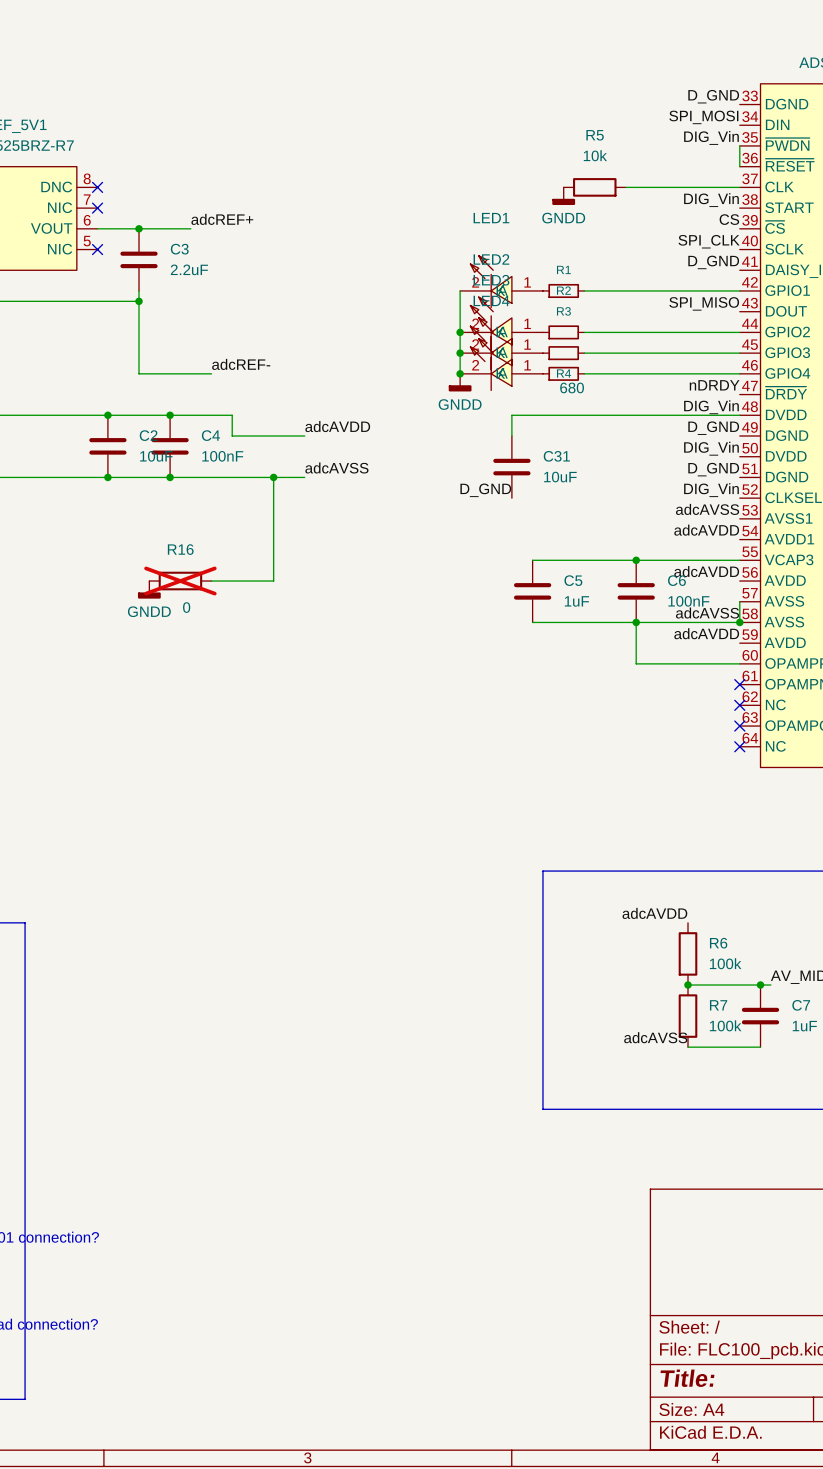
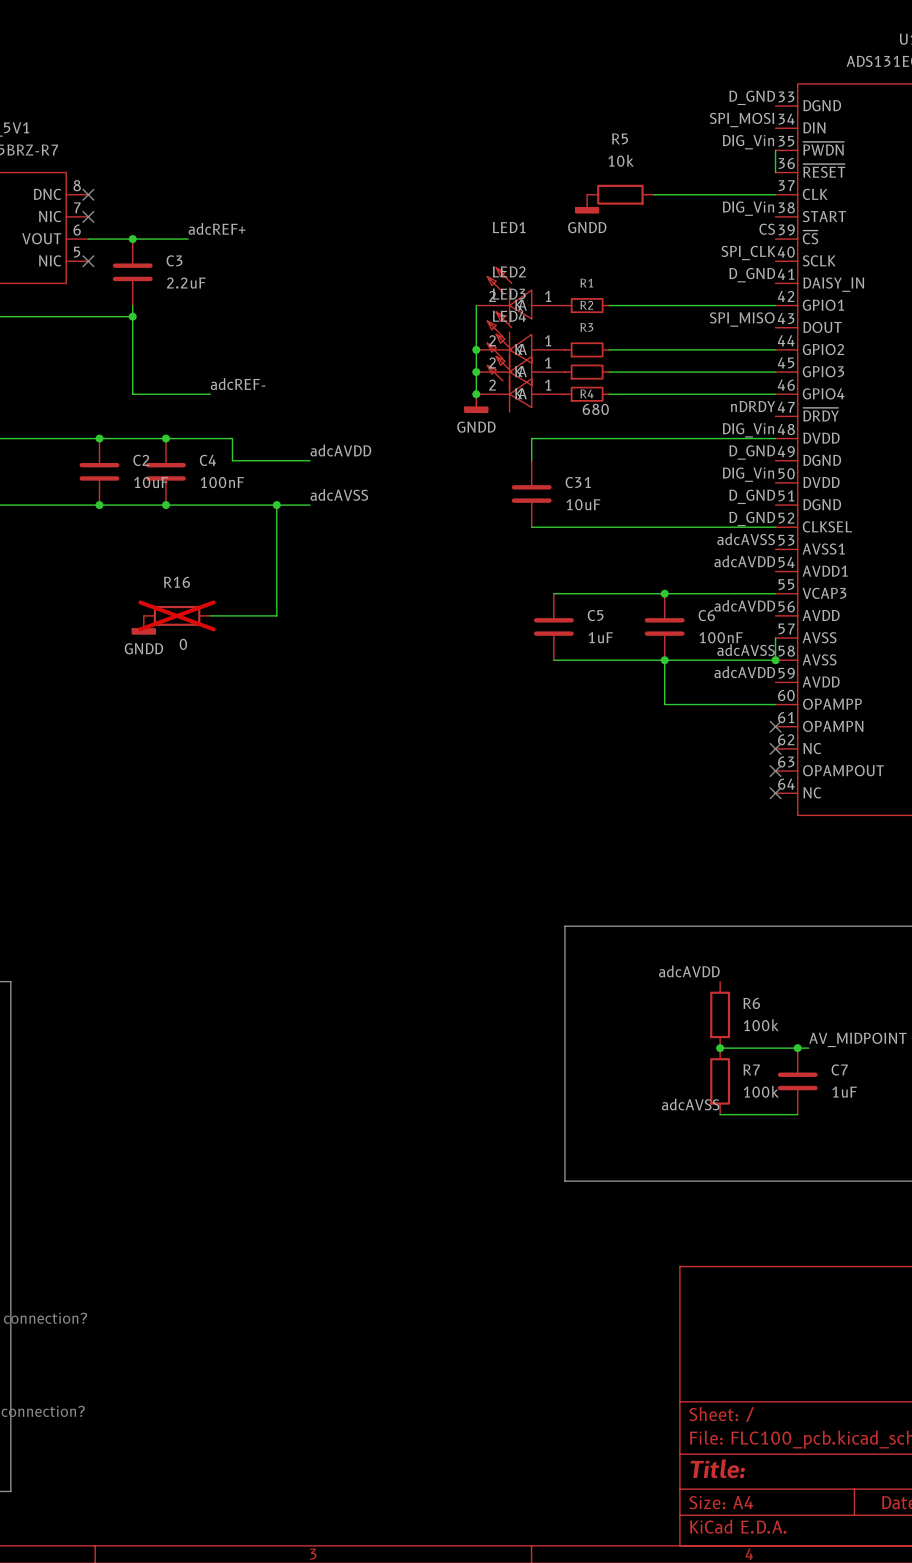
label: D_GND (485, 490) -> none
label: DIG_Vin (711, 490) -> D_GND (752, 519)
wire: none -> (531, 527) (775, 527)

